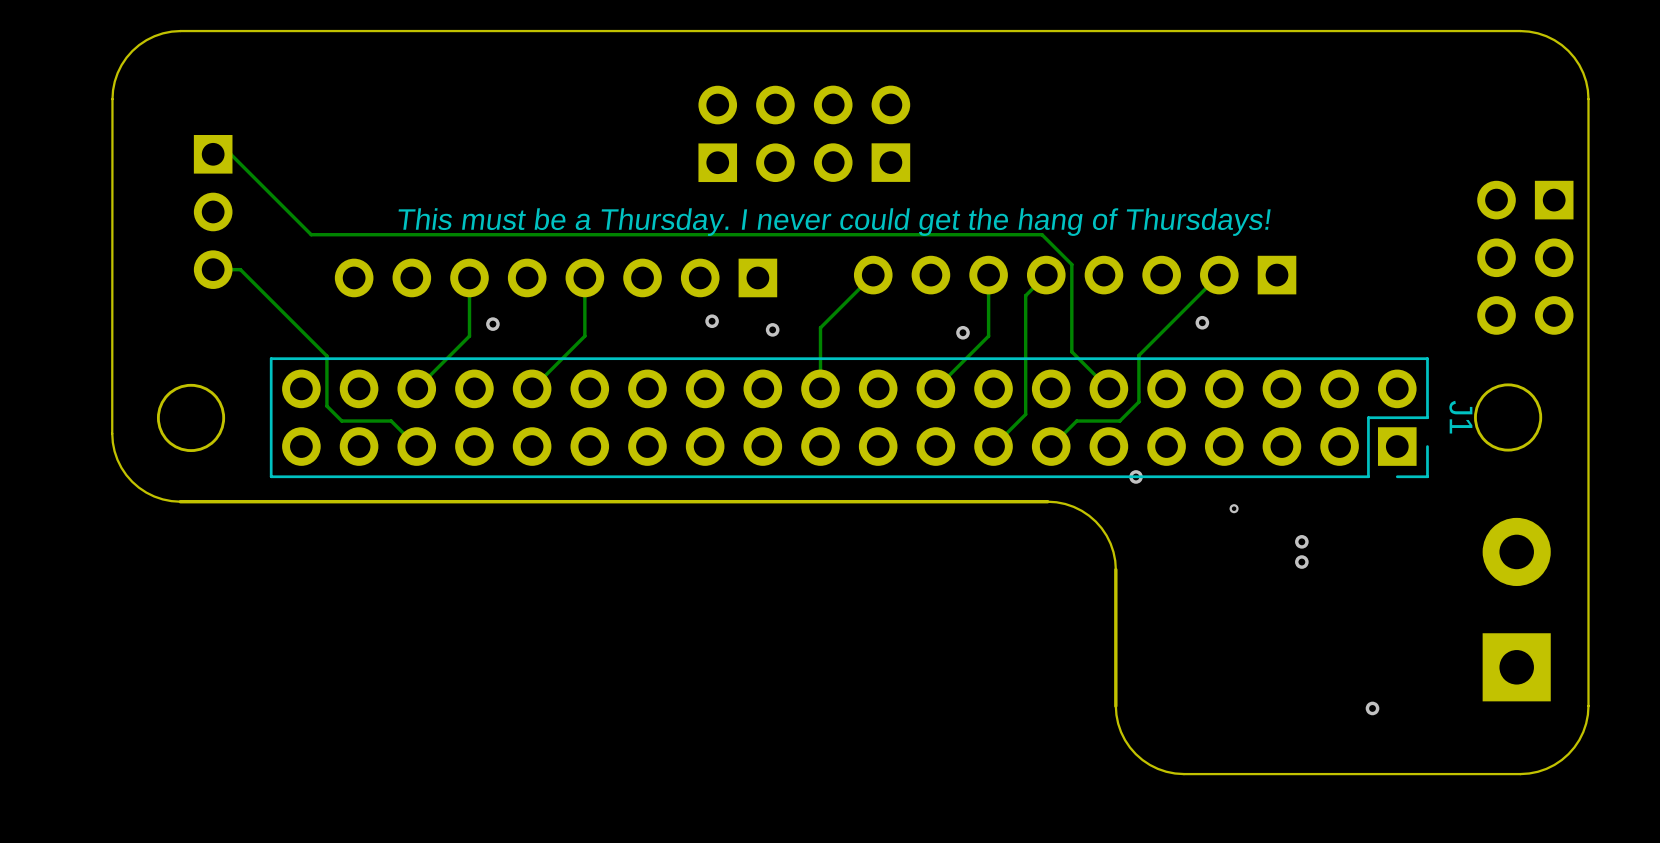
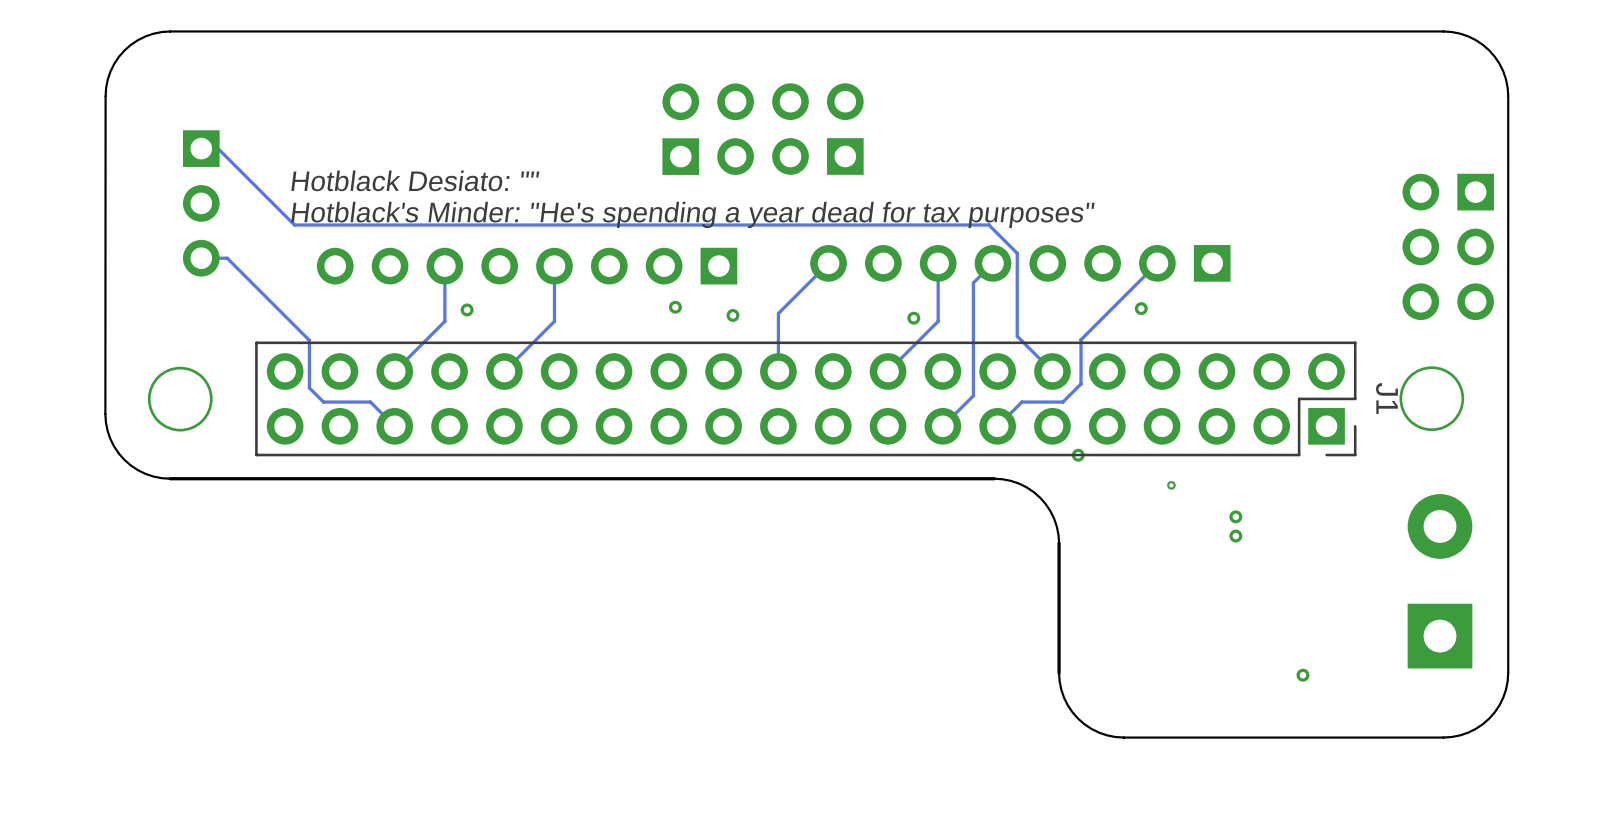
text: none -> Hotblack Desiato: "" (415, 180)
text: This must be a Thursday. I never could get the hang of Thursdays! (834, 222) -> none
text: none -> Hotblack's Minder: "He's spending a year dead for tax purposes" (692, 214)

